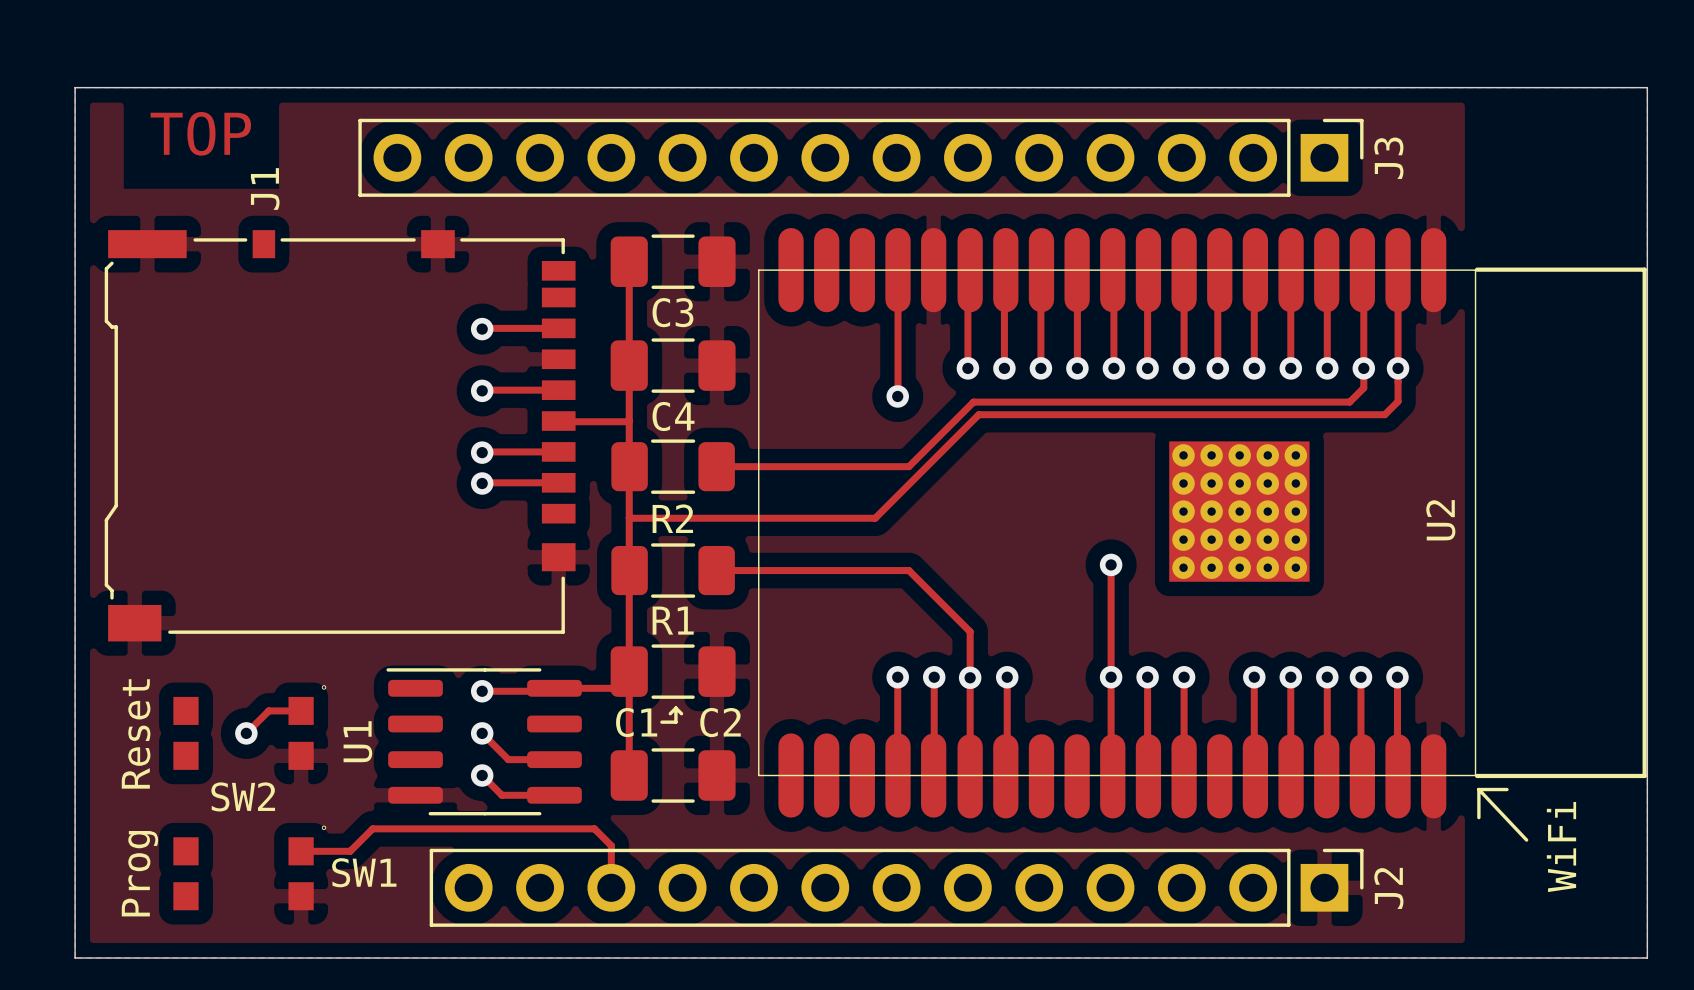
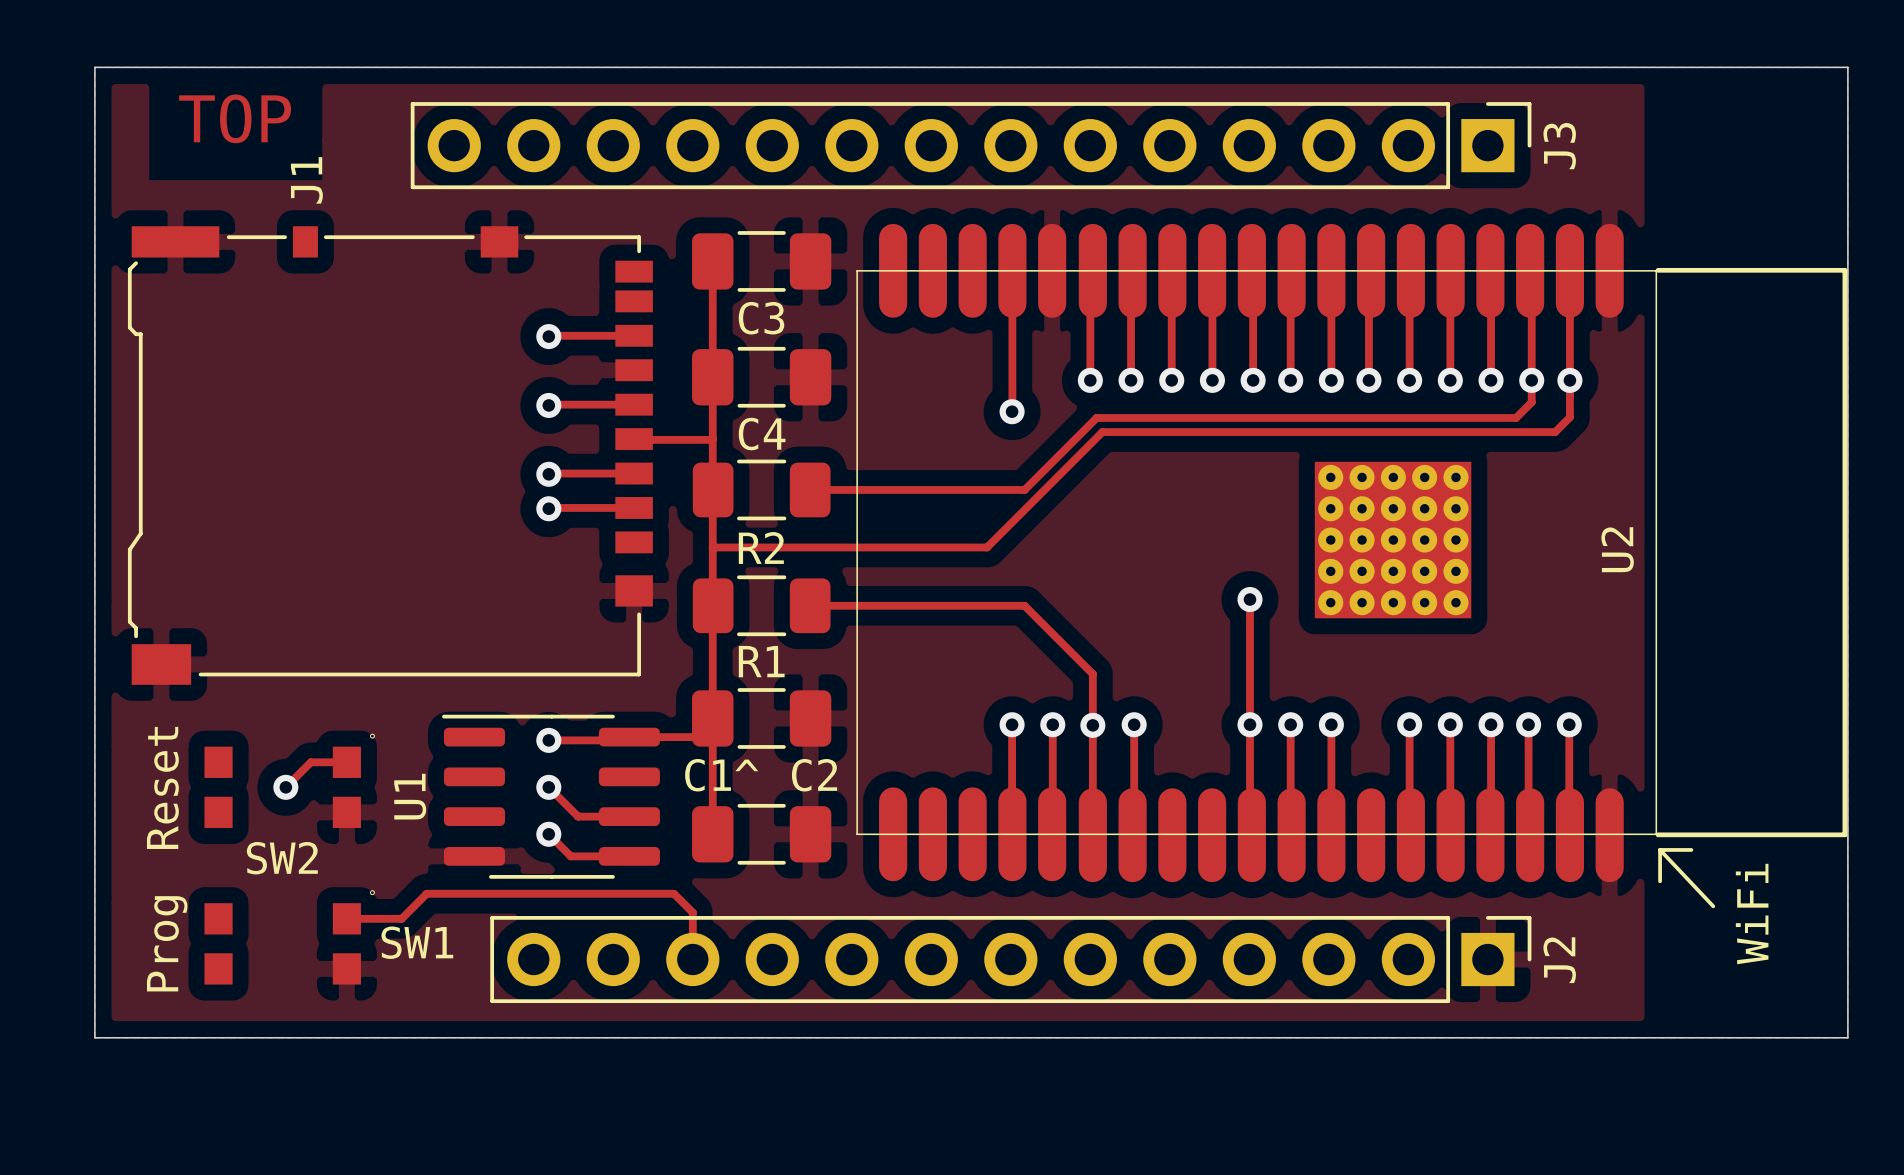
line: (675, 708) (681, 713) -> none
line: (675, 708) (670, 713) -> none
line: (675, 708) (675, 722) (661, 722) -> none
C1 name: C1 (636, 722) -> C1^ (721, 775)

